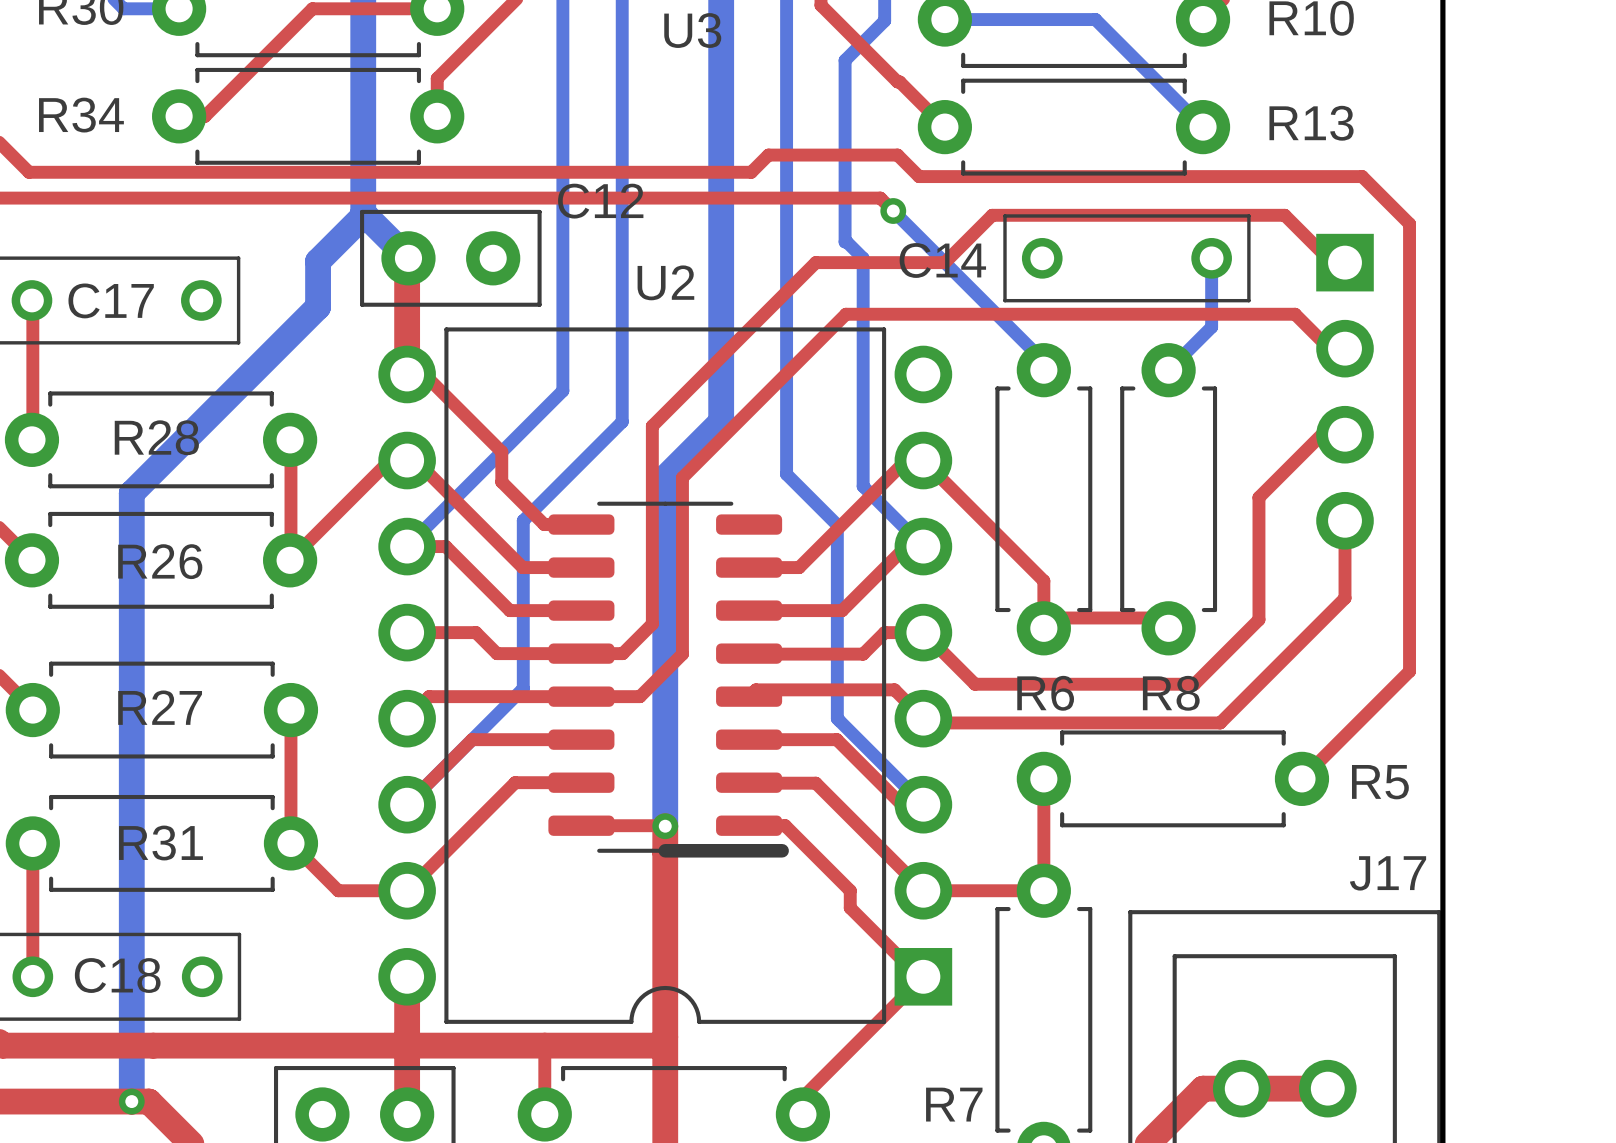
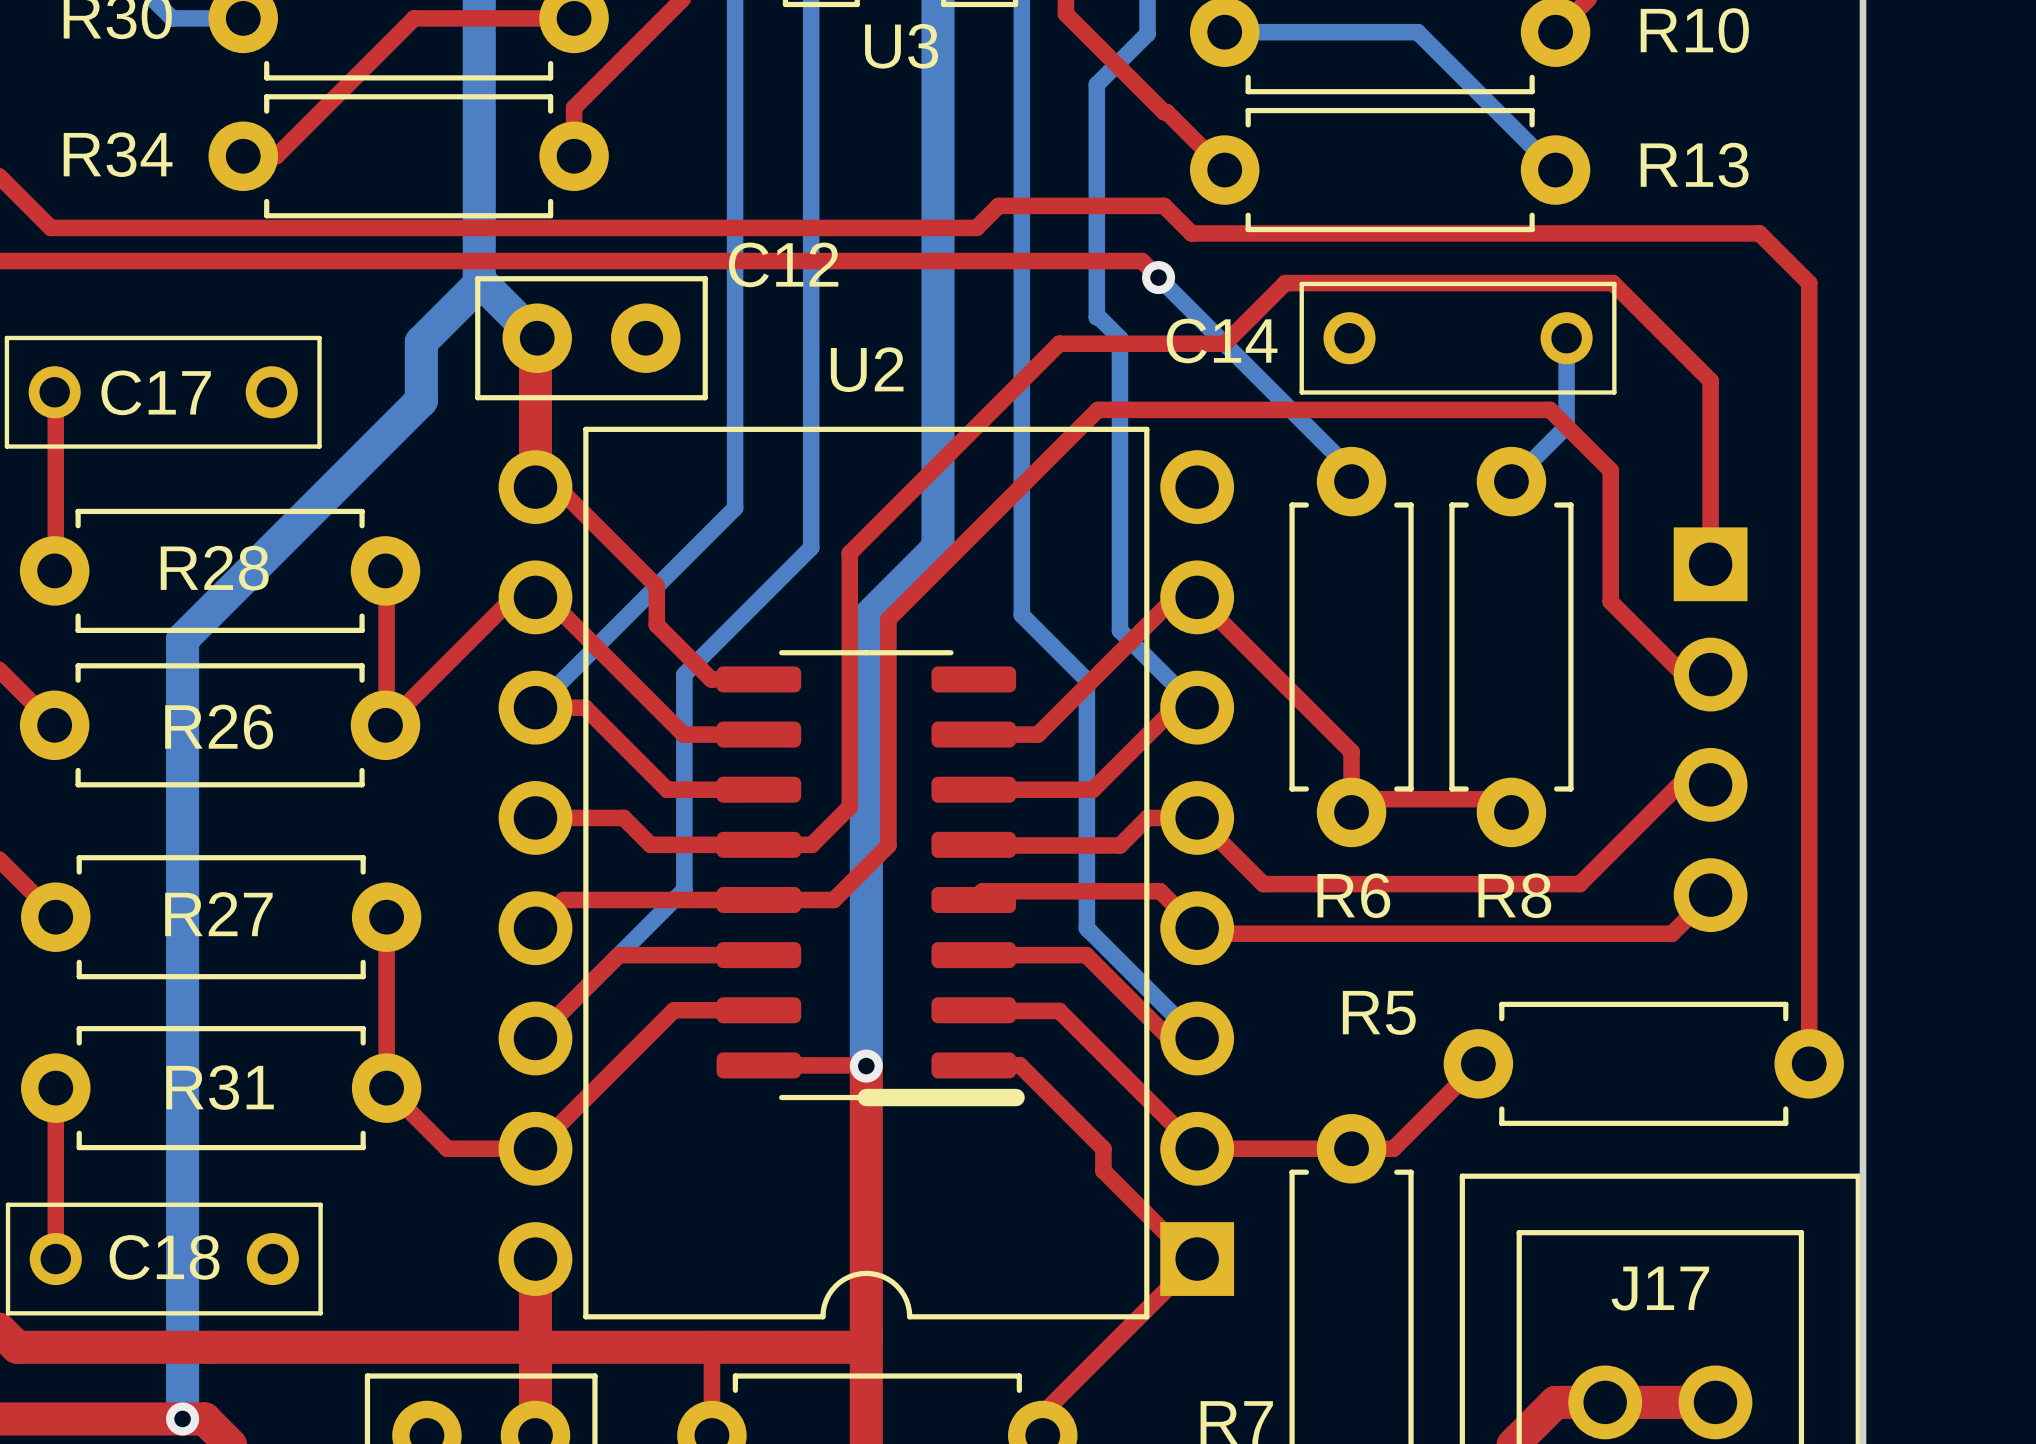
top track: (1247, 215) (1284, 215) (1332, 262) -> (1612, 283) (1710, 380) (1710, 564)
top track: (1400, 215) (1409, 223) (1409, 671) (1301, 778) -> (1809, 283) (1809, 1063)
top track: (1198, 314) (1295, 314) (1329, 348) -> (1550, 409) (1610, 470) (1610, 601) (1683, 674) (1710, 674)
part position: (1345, 391) -> (1710, 729)
top track: (1323, 432) (1258, 497) (1258, 619) (1194, 684) -> (1710, 784) (1679, 784) (1579, 884) (1544, 884)
top track: (1345, 520) (1345, 598) (1220, 722) -> (1710, 895) (1672, 933) (1577, 933)
top track: (1043, 778) (1043, 890) -> (1478, 1063) (1393, 1148) (1351, 1148)
R5 position: (1172, 778) -> (1643, 1063)
R5 name position: R5 (1380, 782) -> R5 (1379, 1012)
J17 name position: J17 (1388, 873) -> J17 (1660, 1288)

